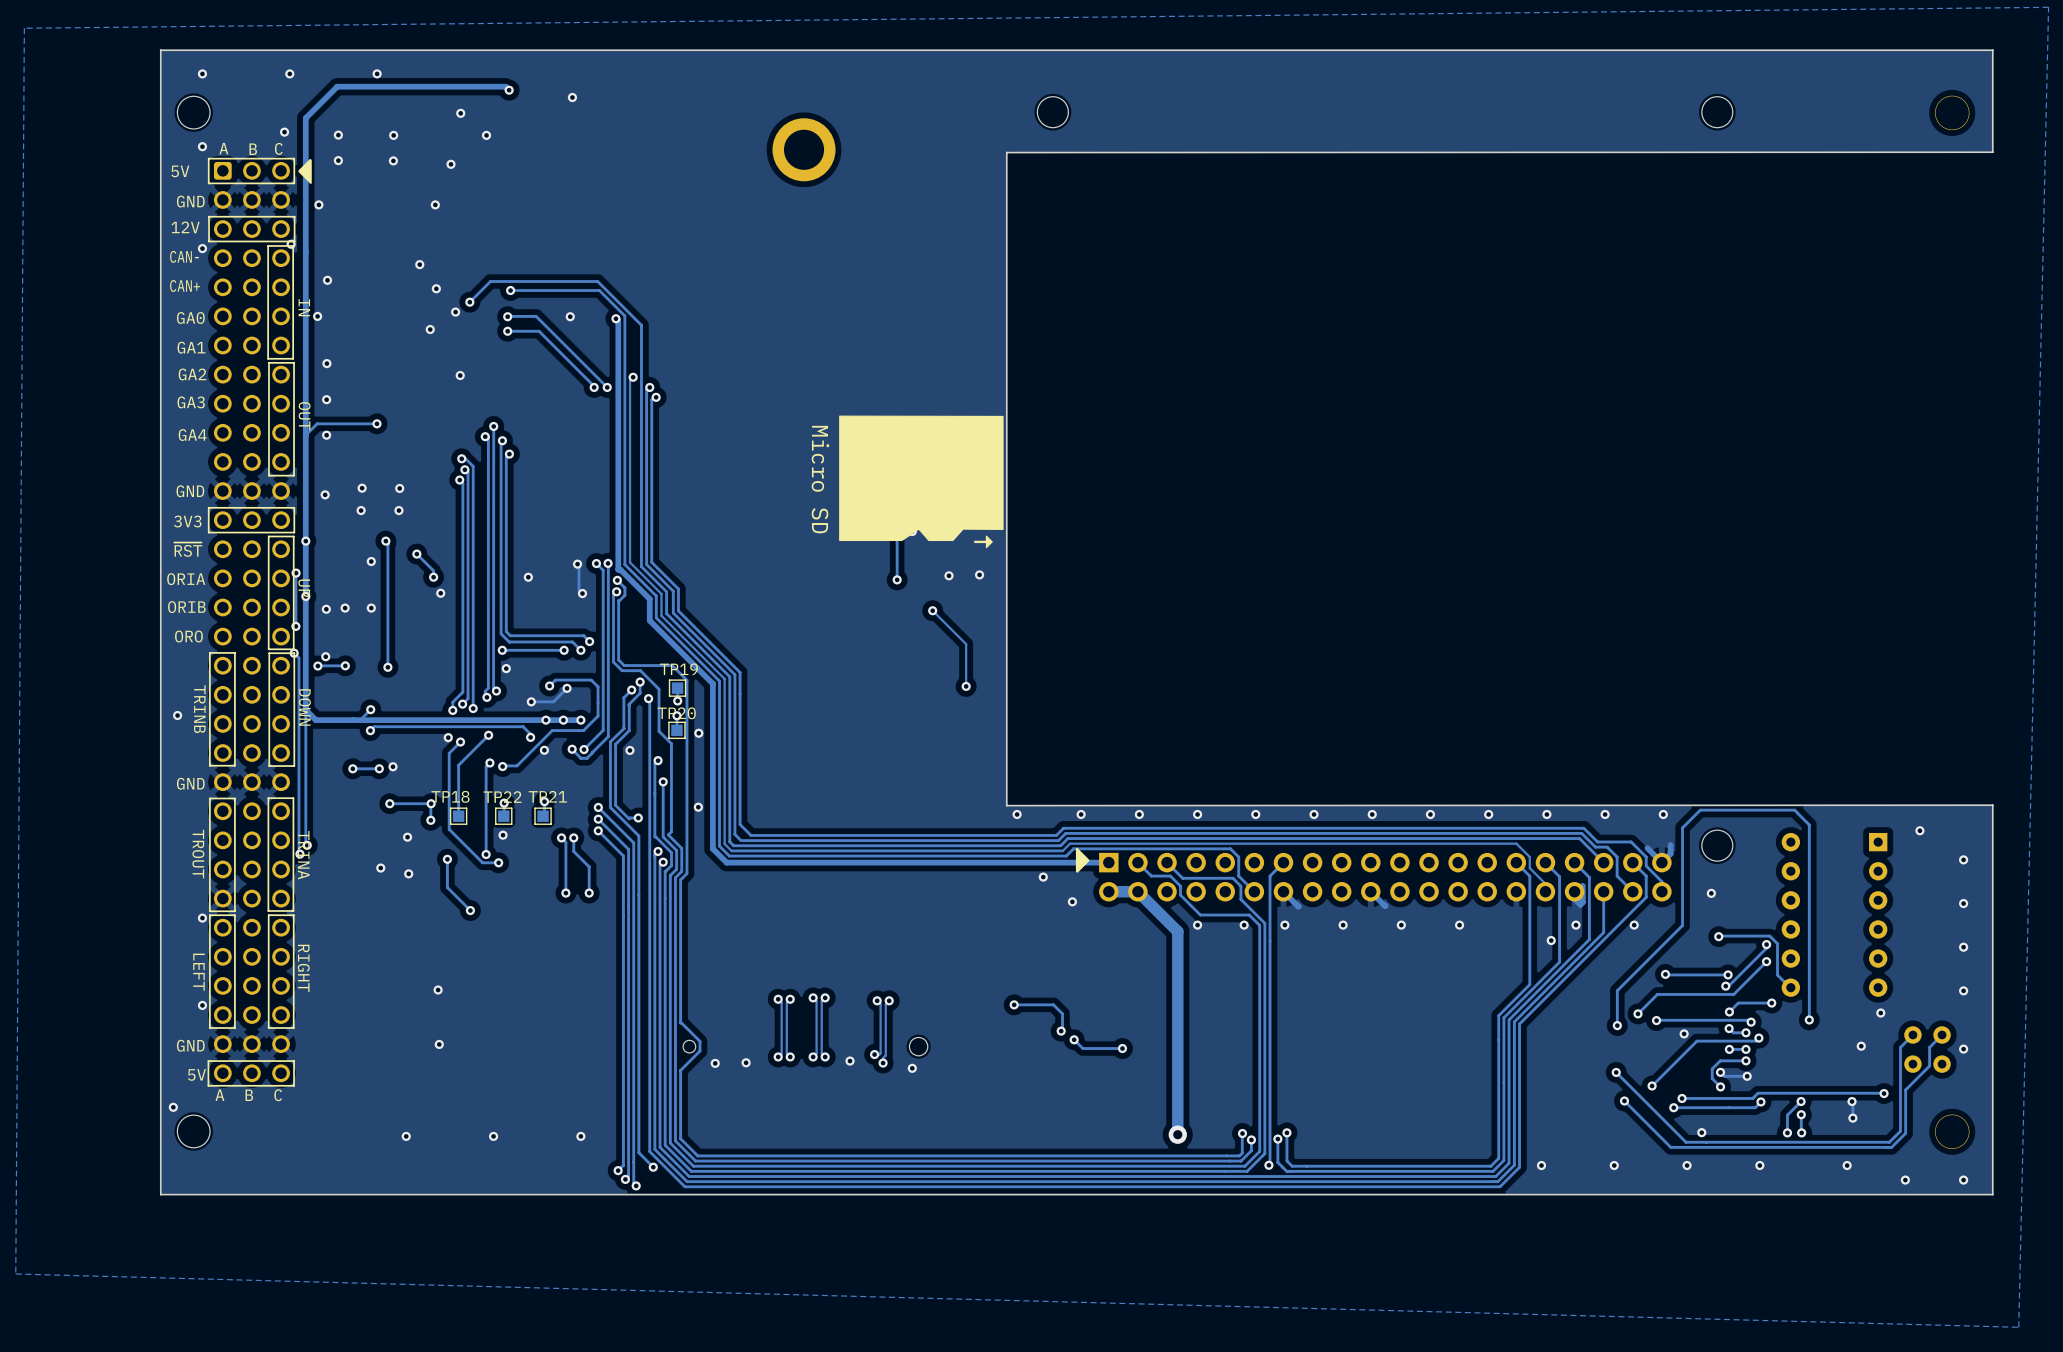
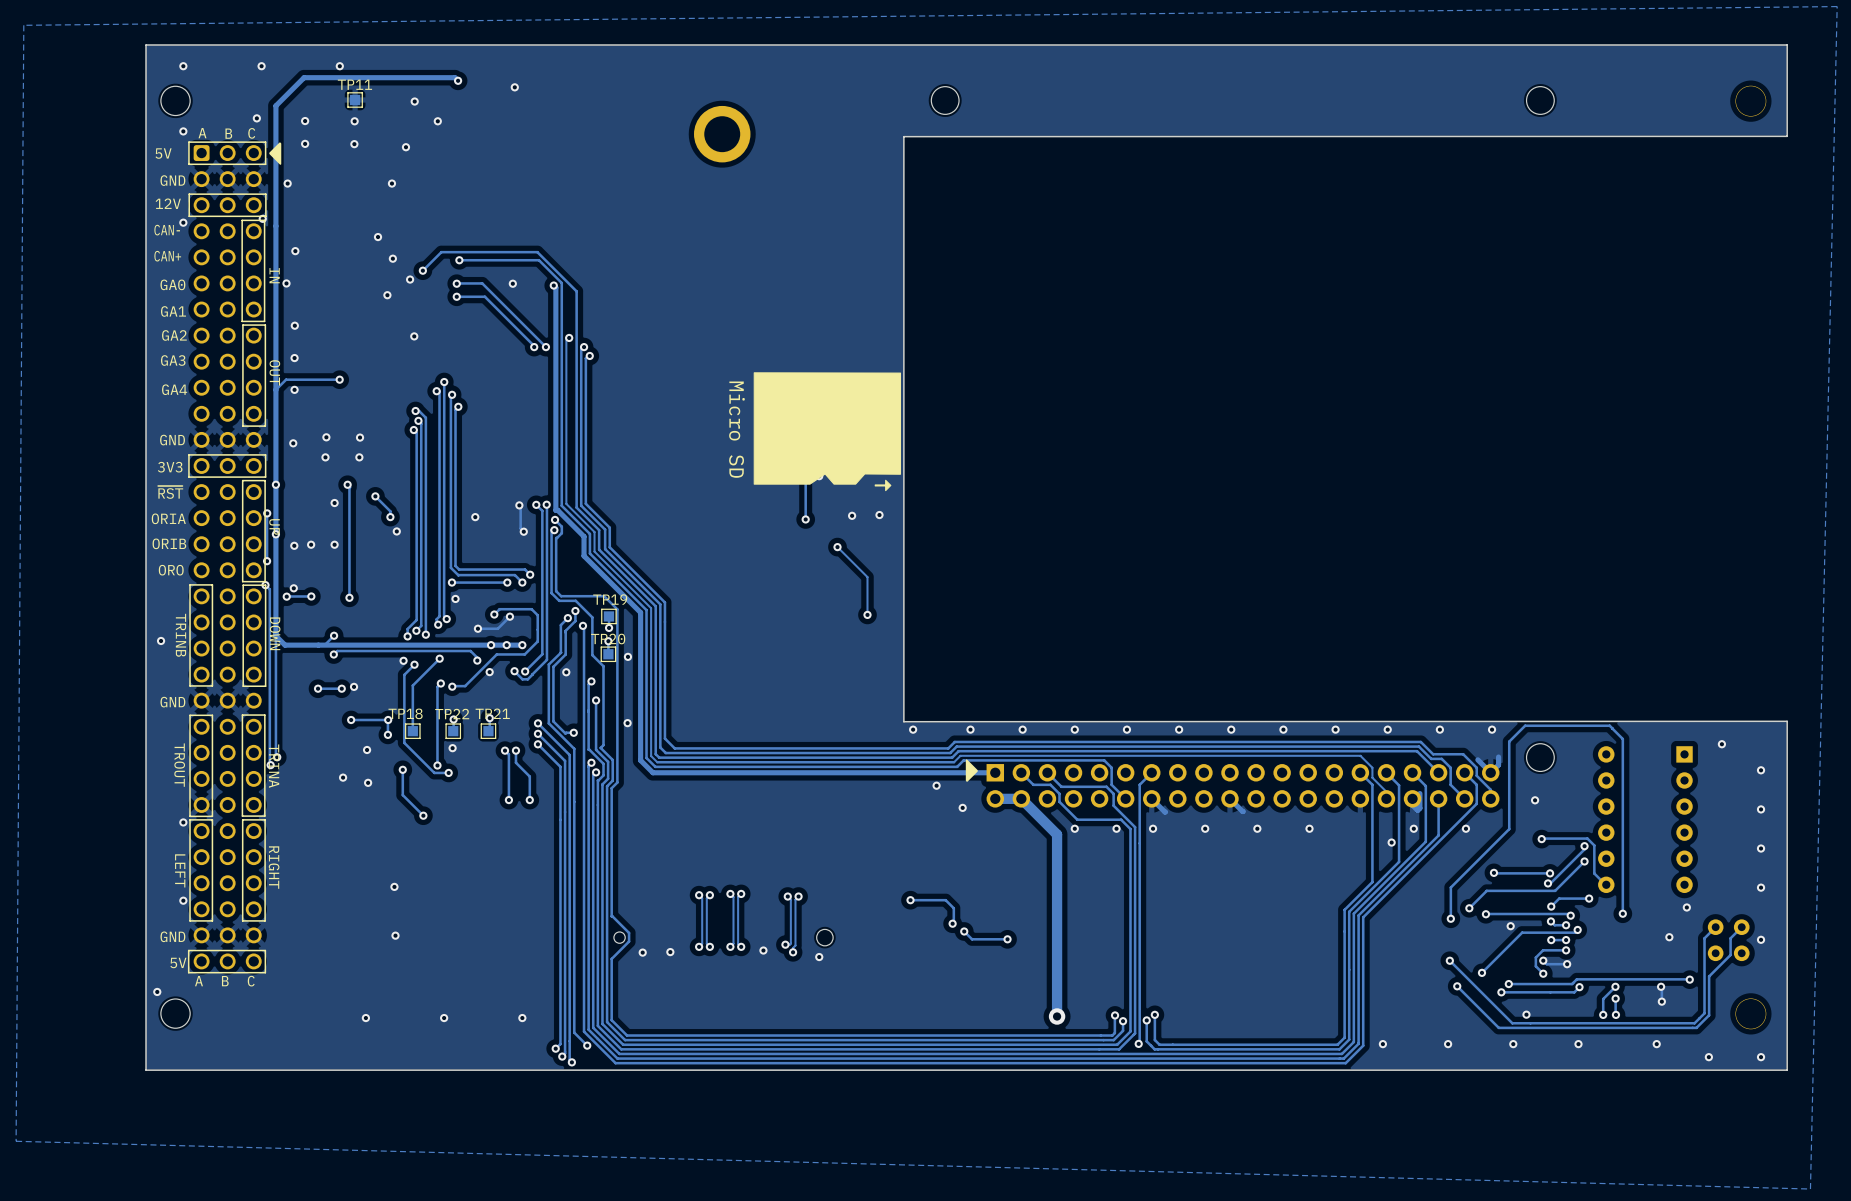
TP11: none -> (355, 99)

